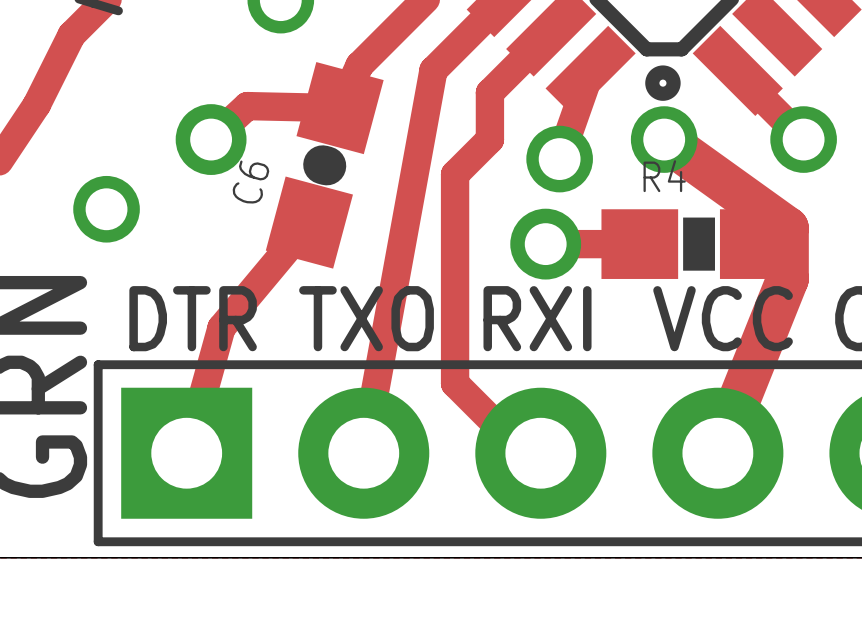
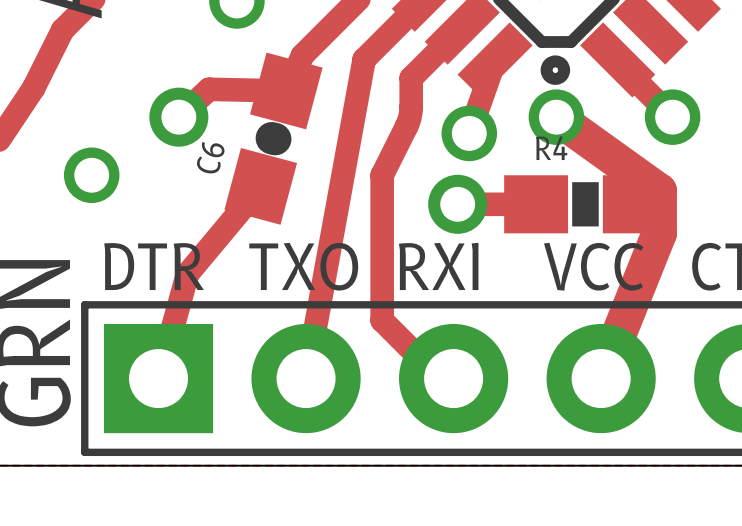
track: (489, 127) (489, 139) (455, 174) (455, 209) -> (411, 106) (408, 121) (382, 175)

